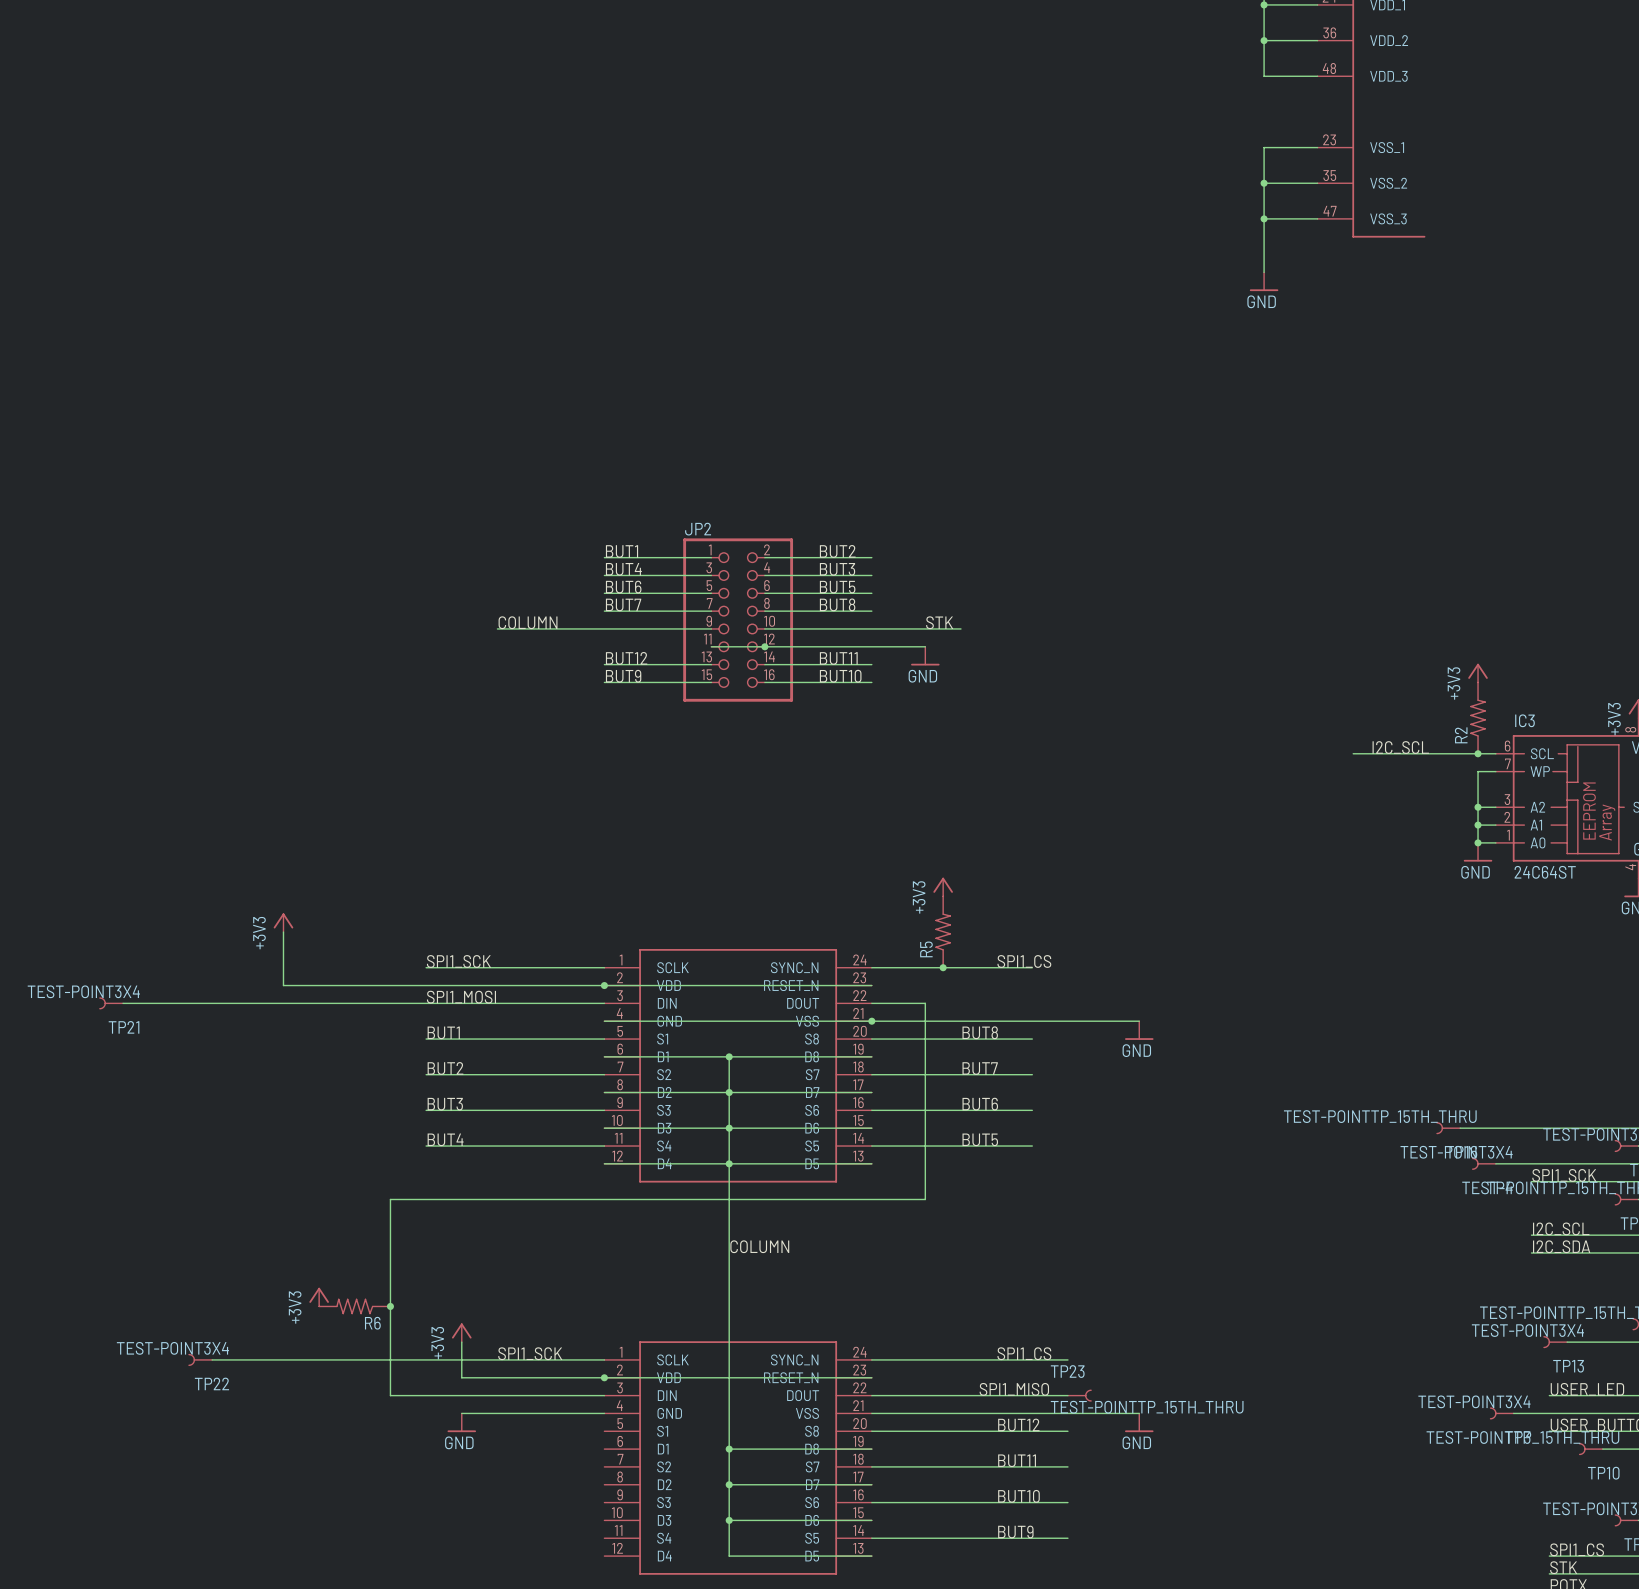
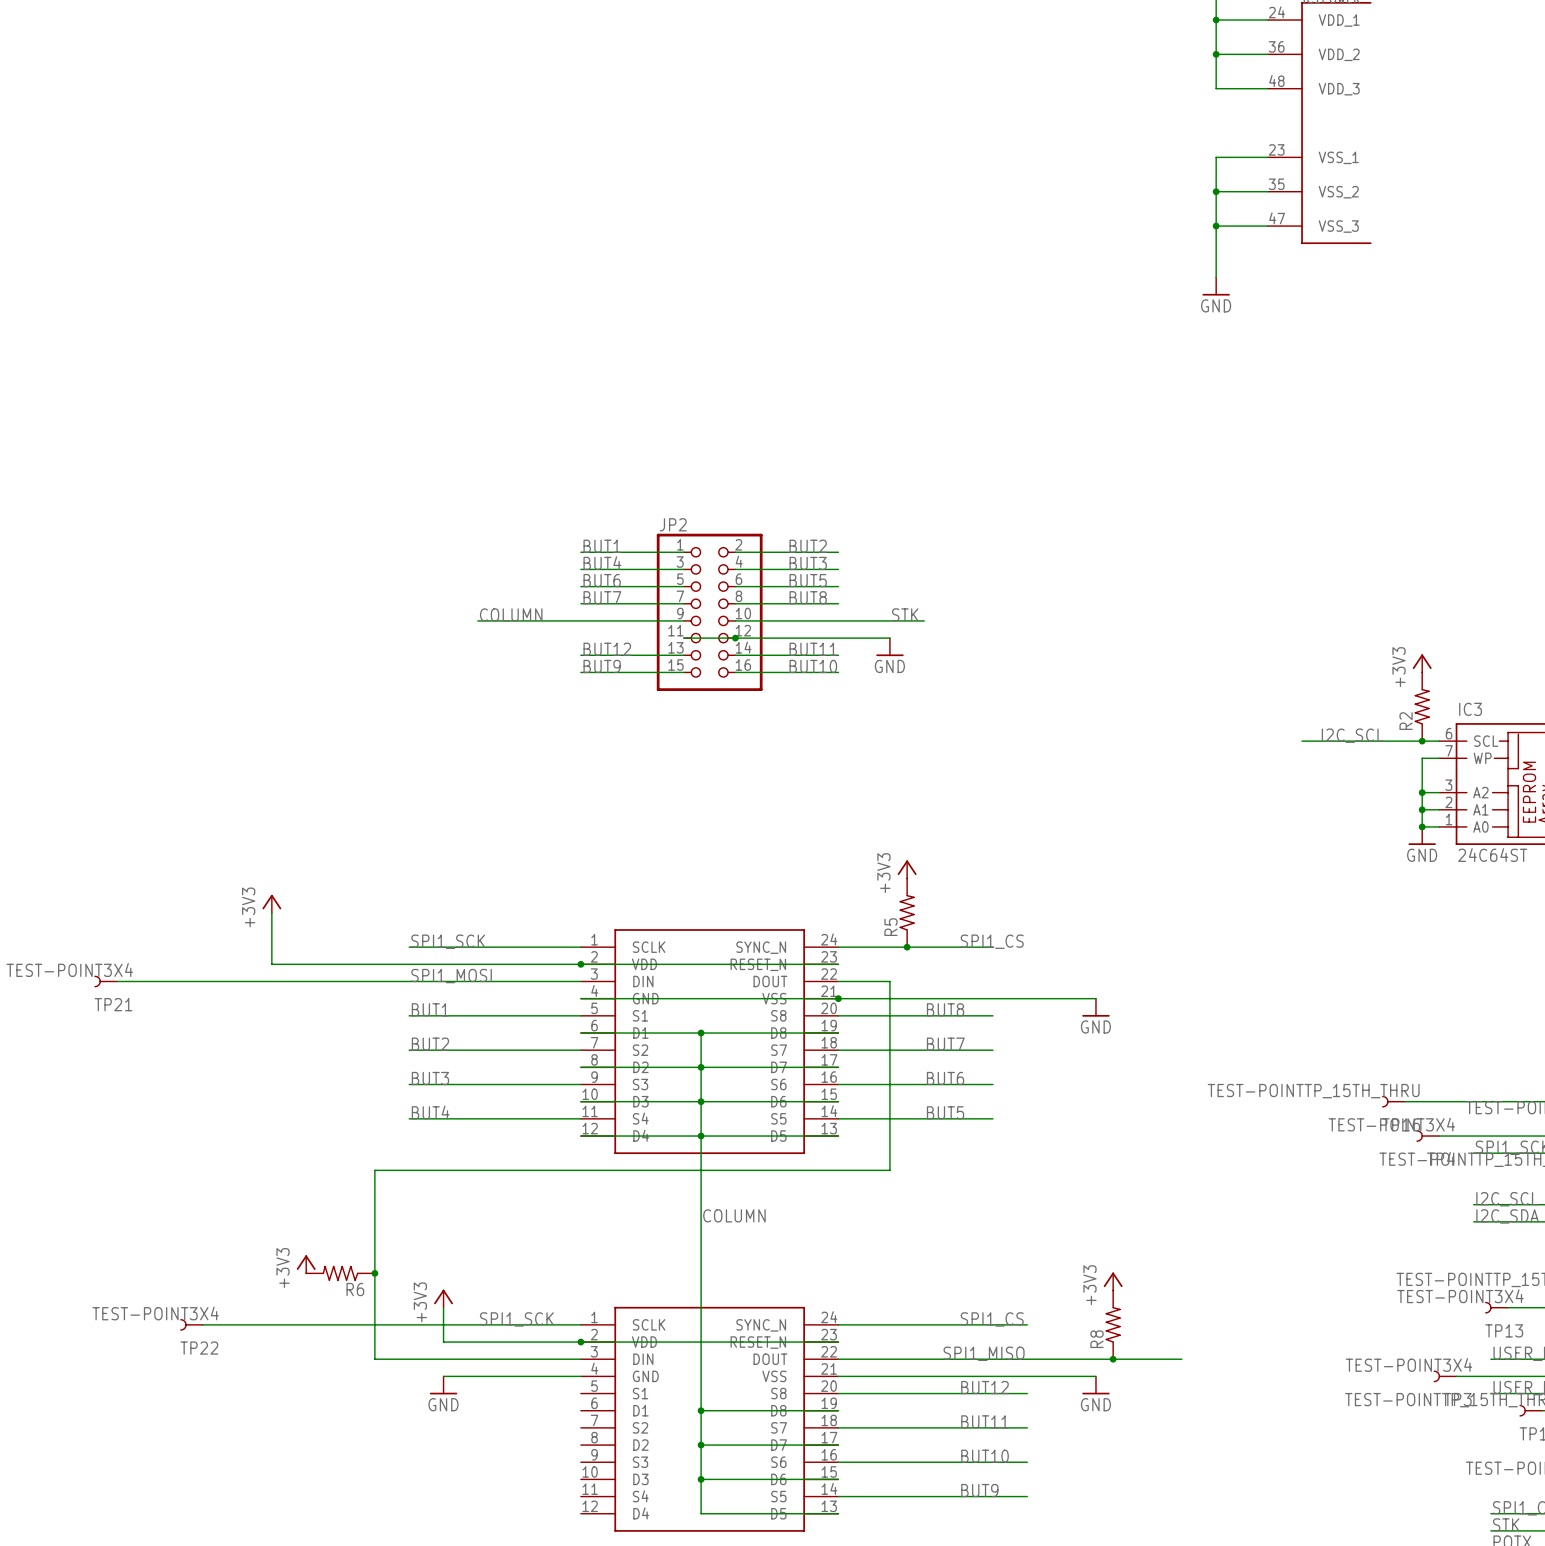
power symbol: none -> +3V3 (1113, 1281)
R8: none -> (1113, 1324)
wire: none -> (1027, 1359) (1181, 1359)
TP23: TEST-POINTTP_15TH_THRU (1079, 1395) -> none
junction: none -> (1113, 1359)

